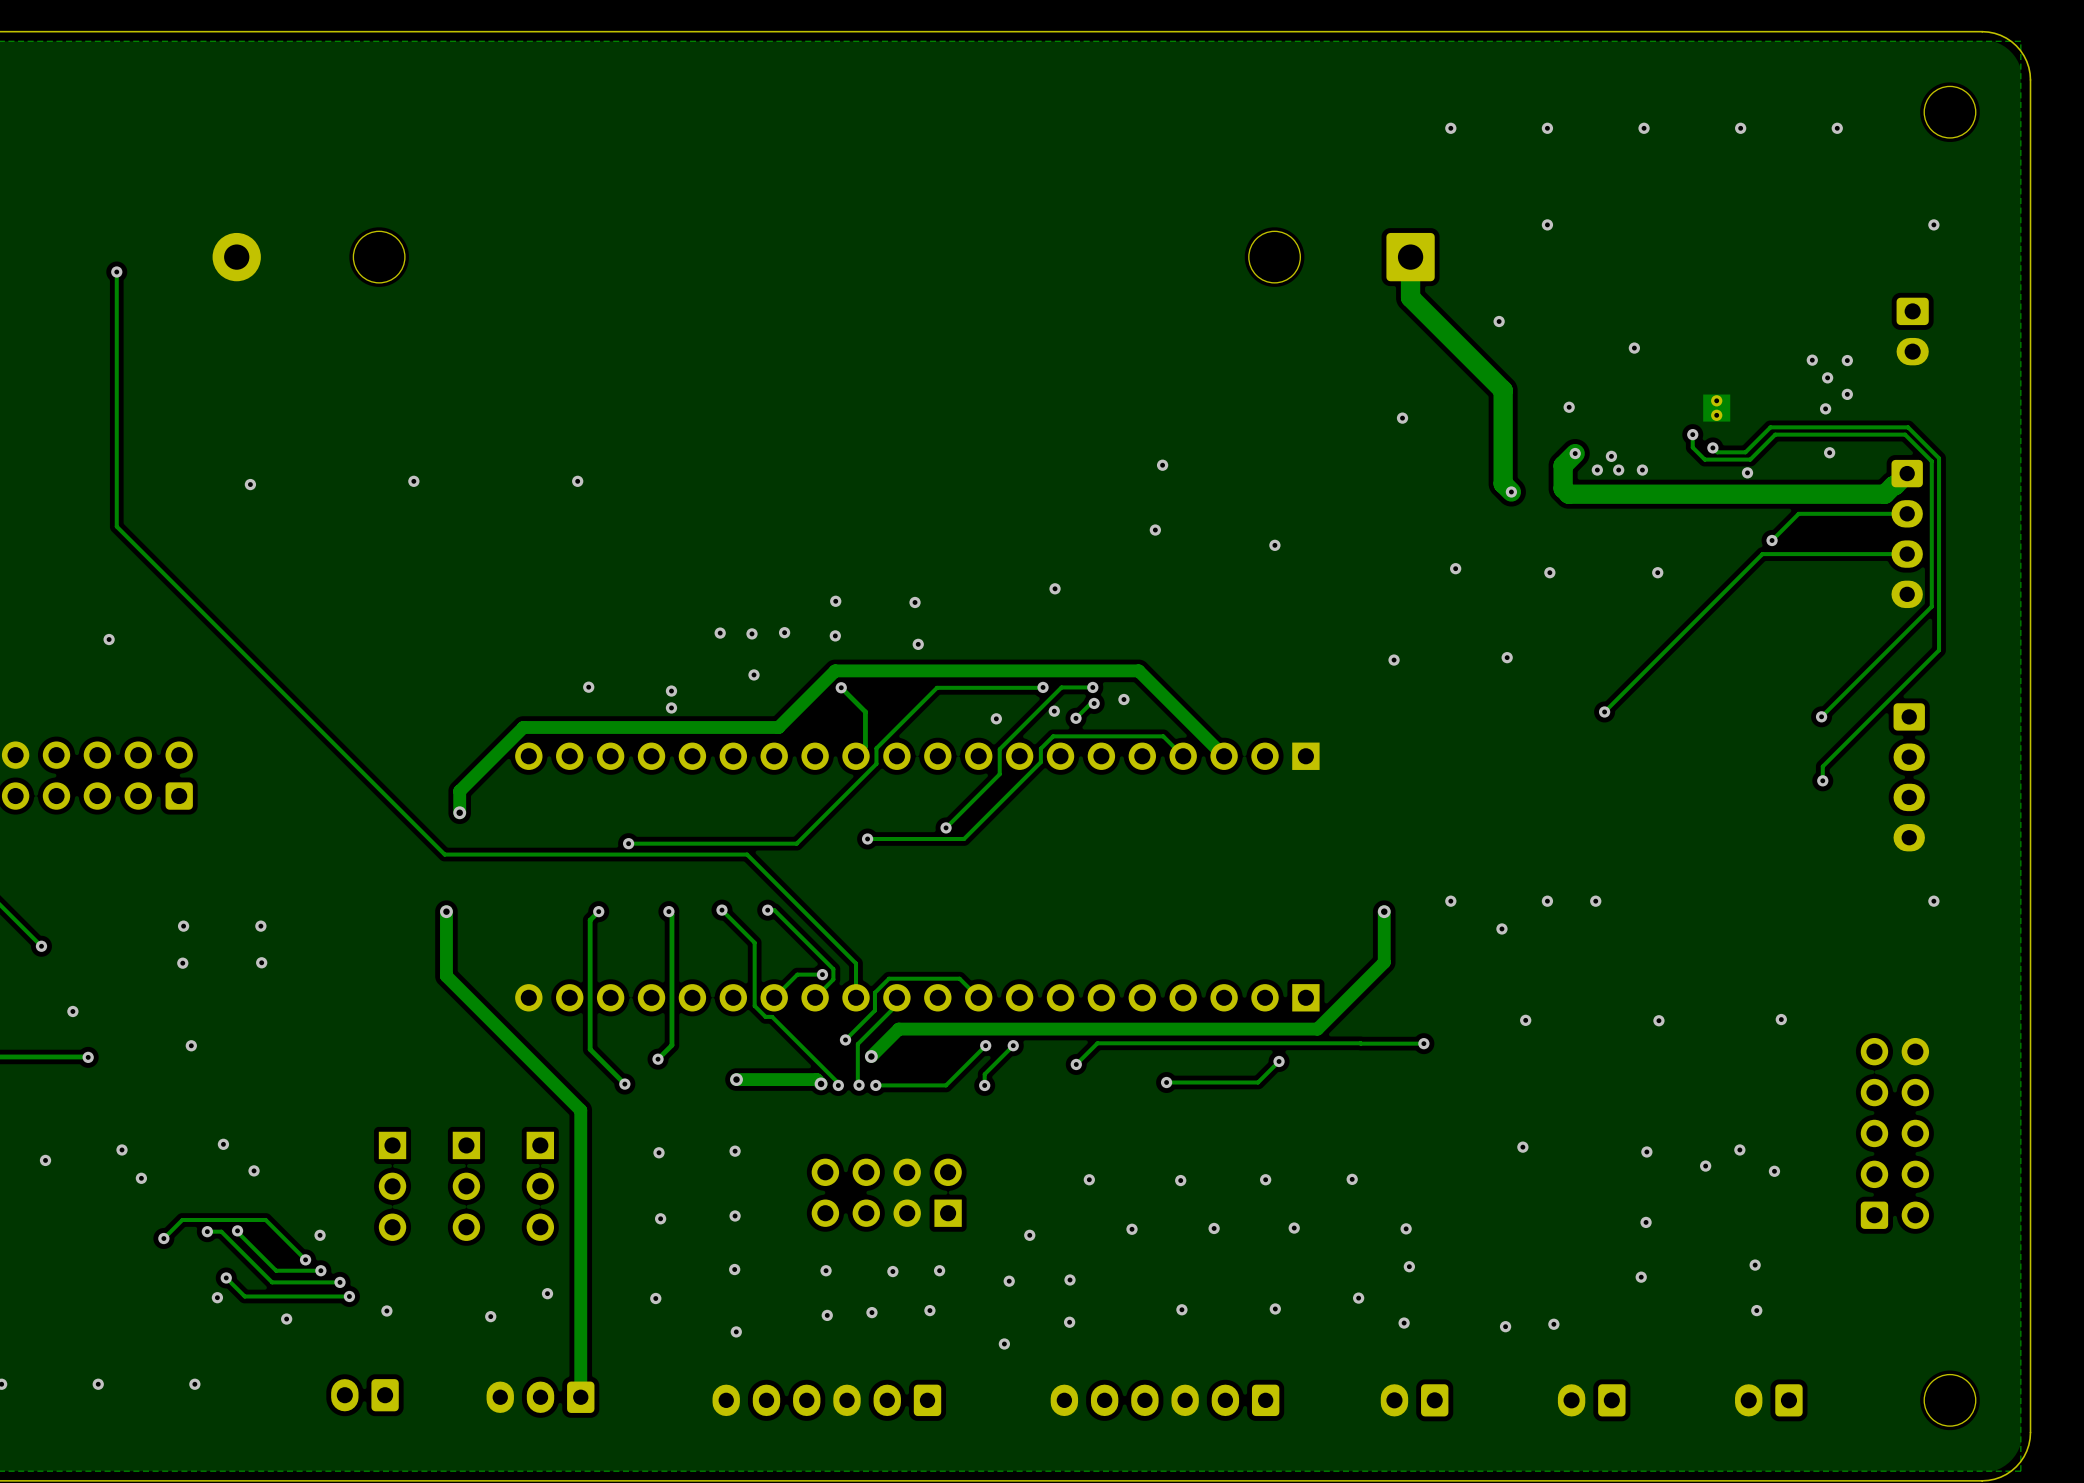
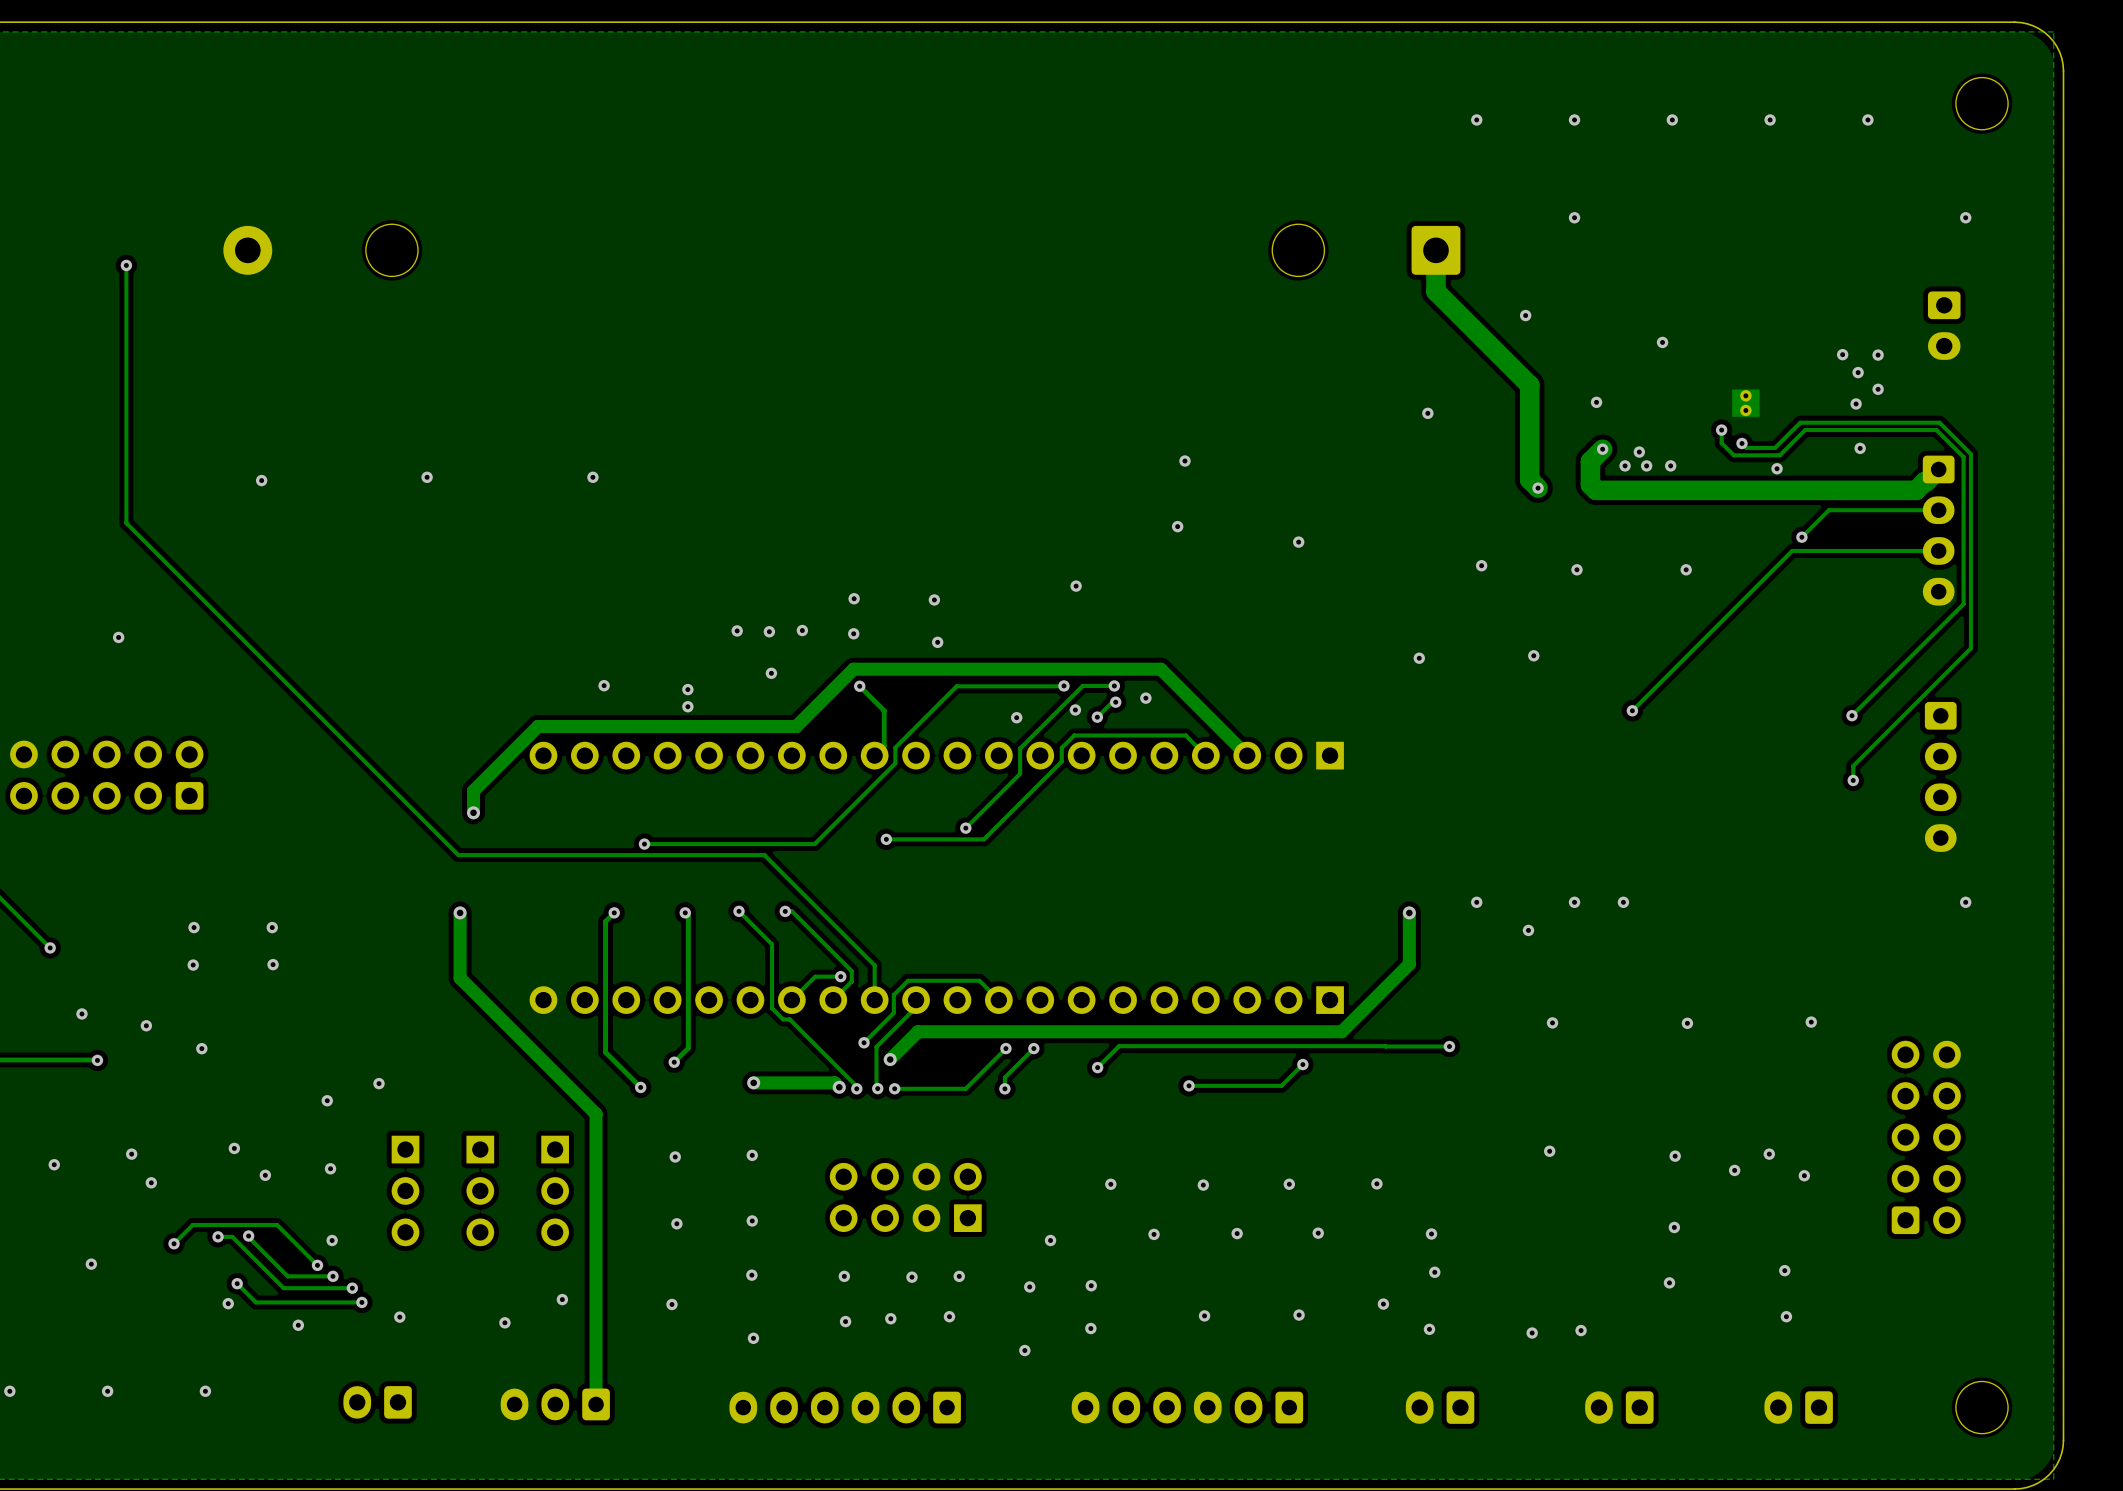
via: none -> (146, 1025)
via: none -> (379, 1083)
via: none -> (327, 1100)
via: none -> (330, 1168)
via: none -> (91, 1264)

